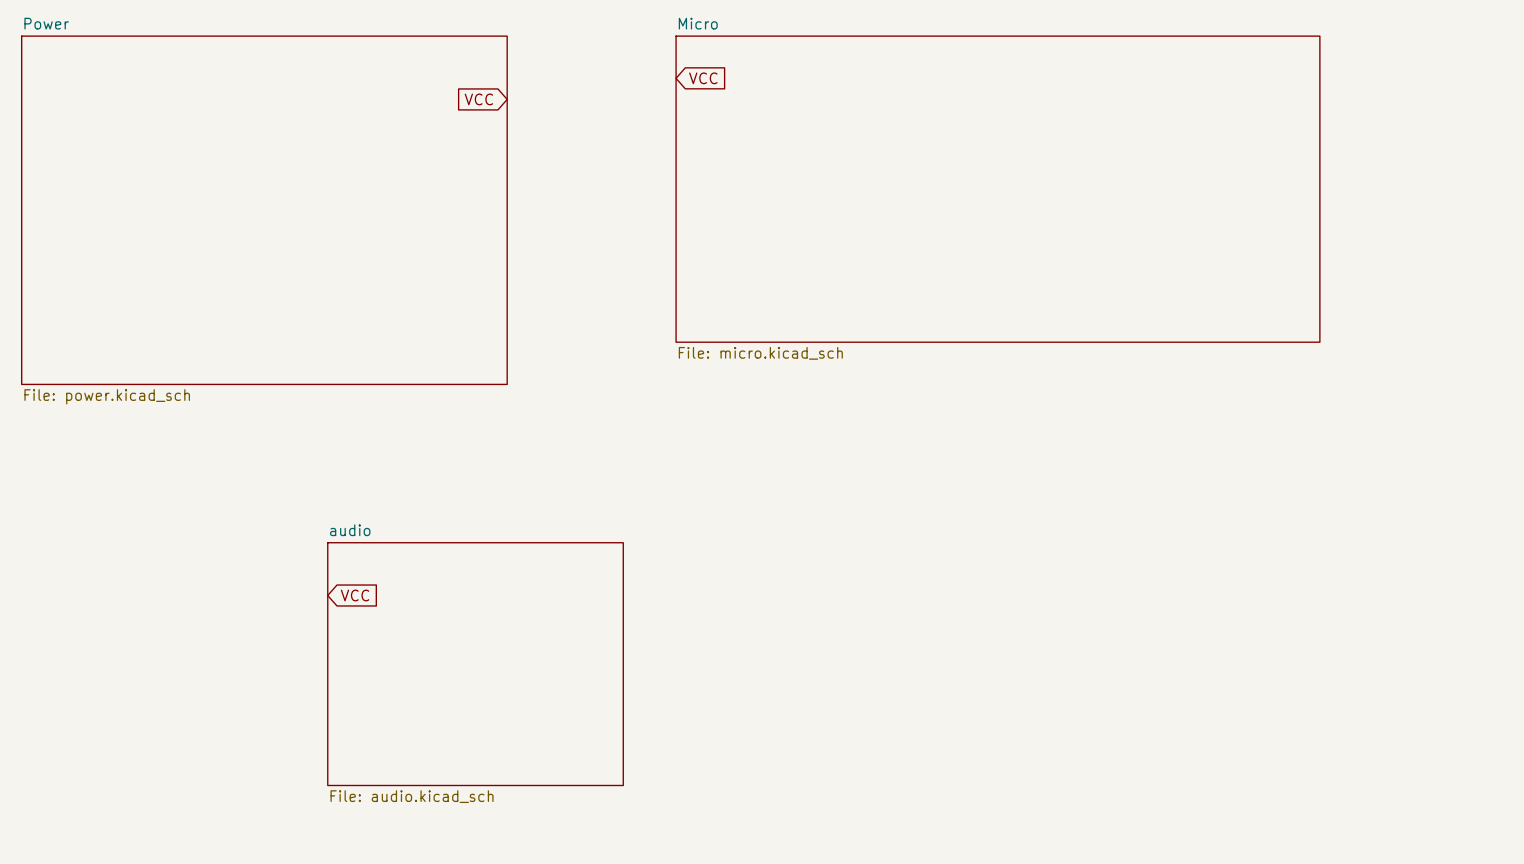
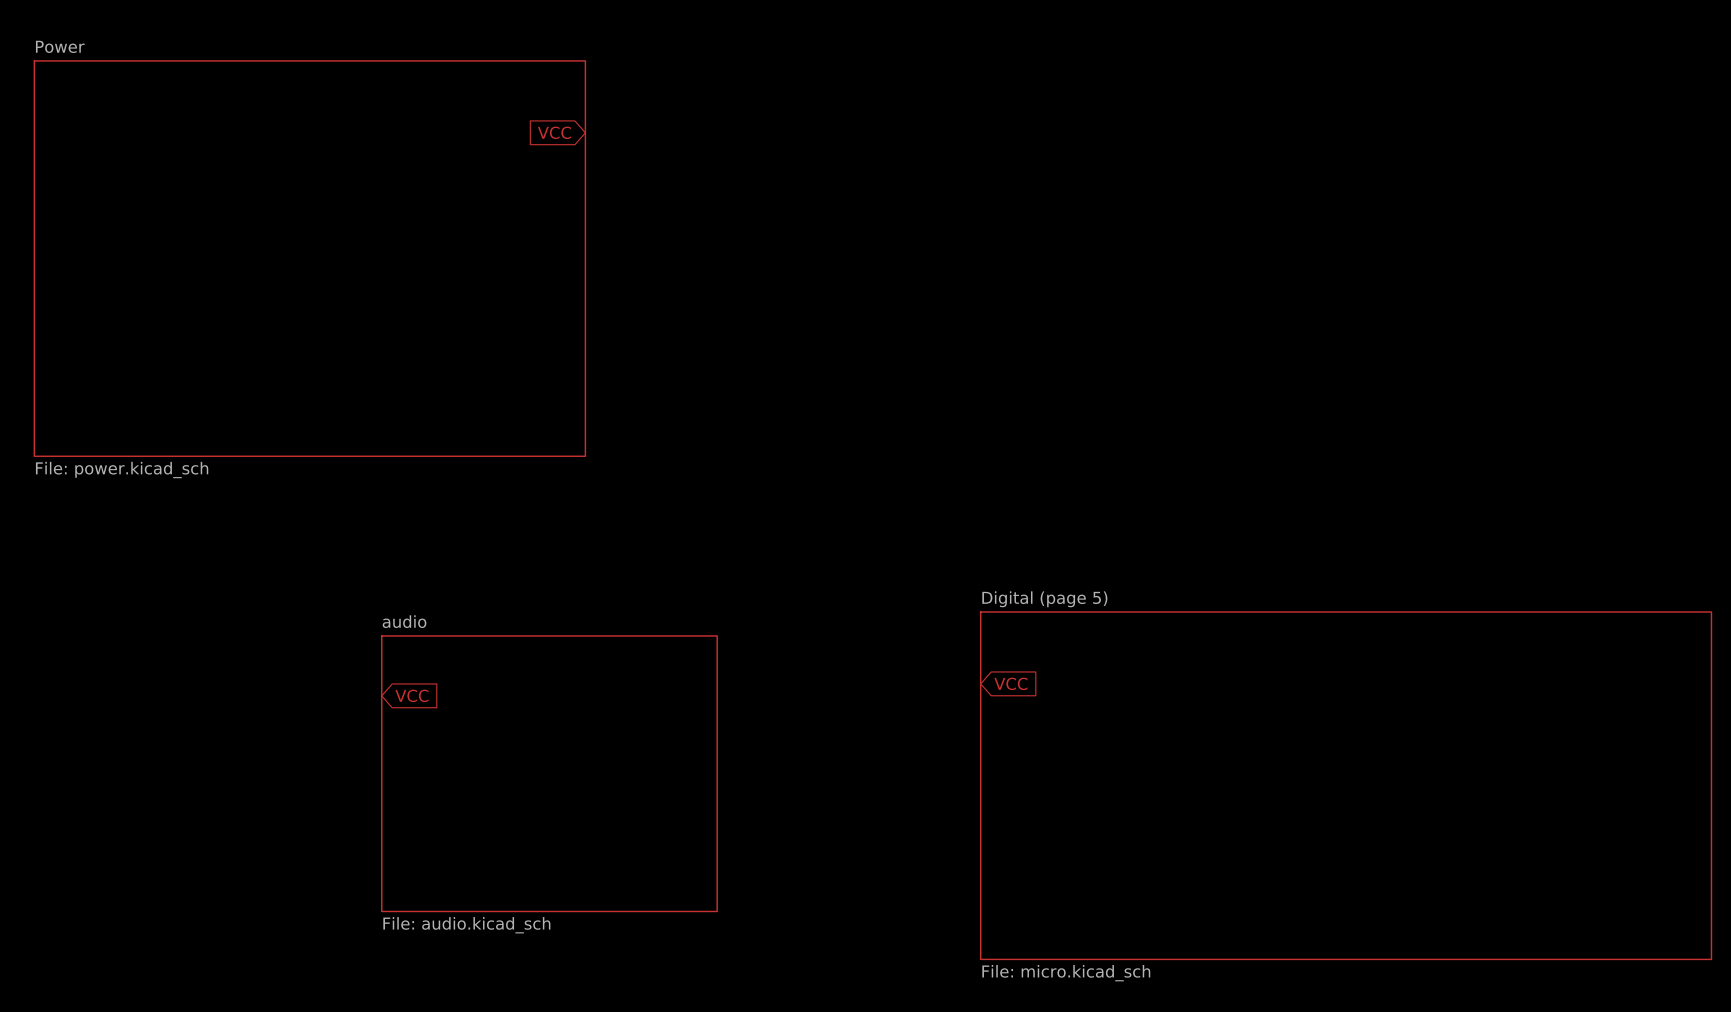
global label: VCC (703, 78) -> none
sheet Micro: File: micro.kicad_sch (997, 189) -> none
global label: none -> VCC (1010, 683)
sheet Digital (page 5): none -> File: micro.kicad_sch (1346, 785)

